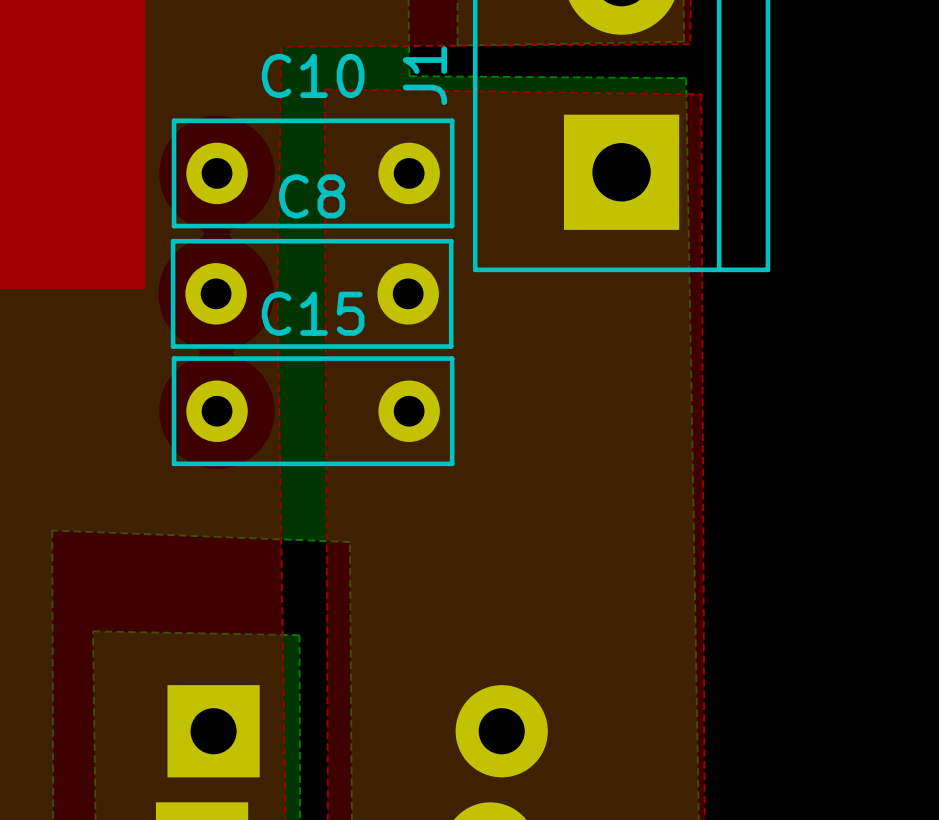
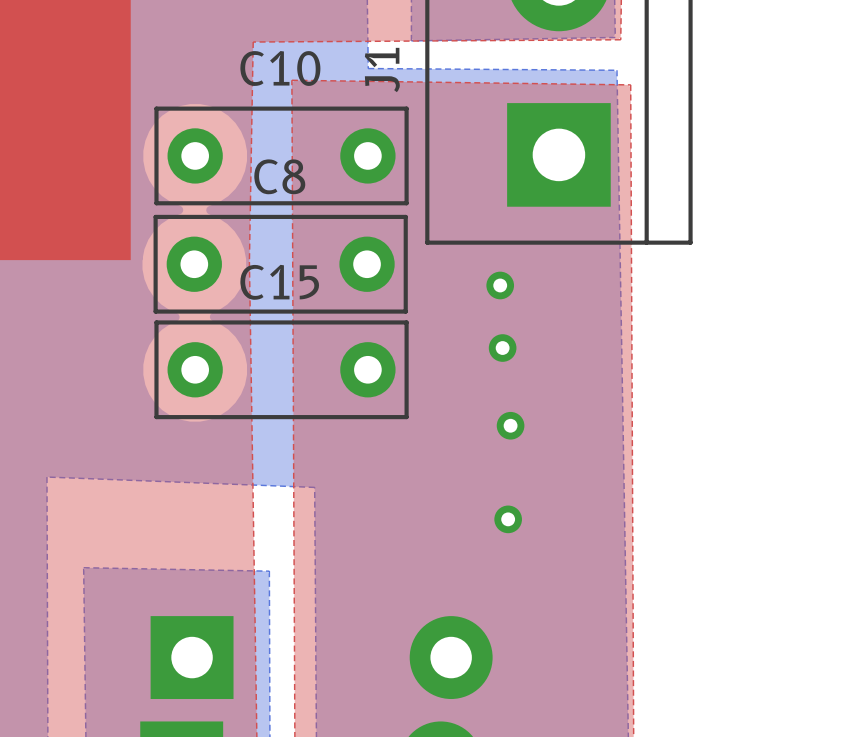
via: none -> (500, 285)
via: none -> (502, 348)
via: none -> (510, 425)
via: none -> (508, 519)

